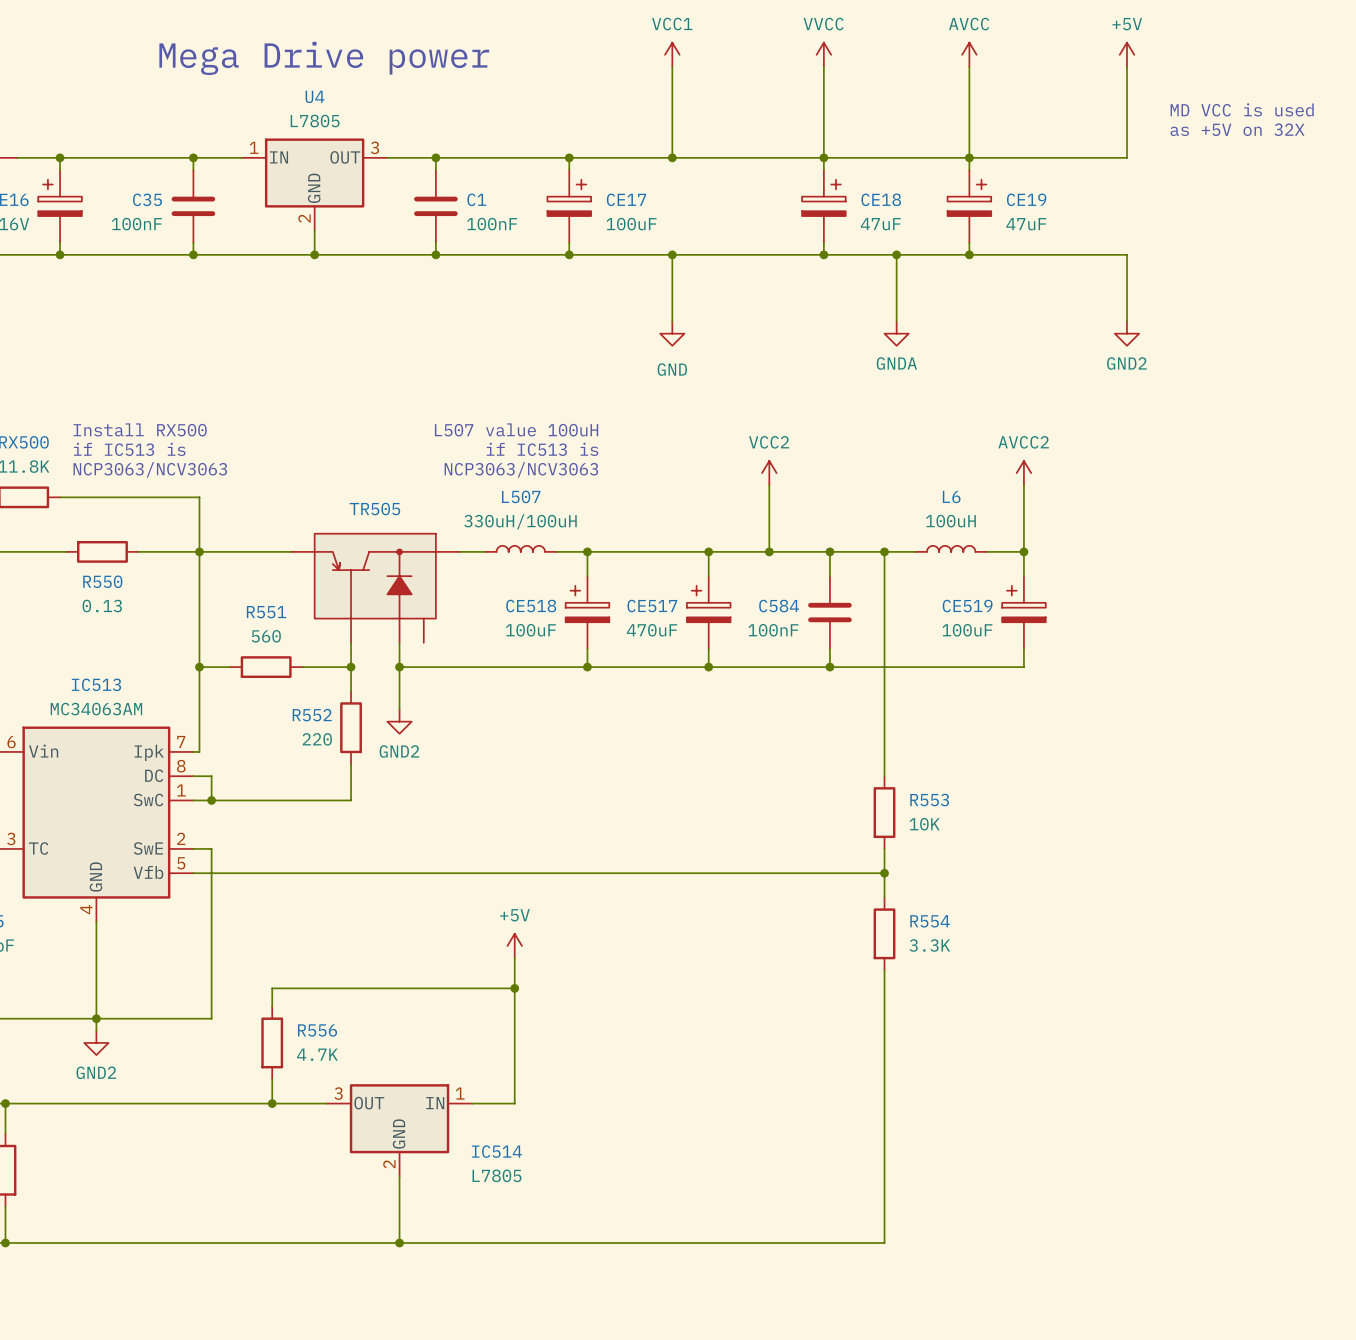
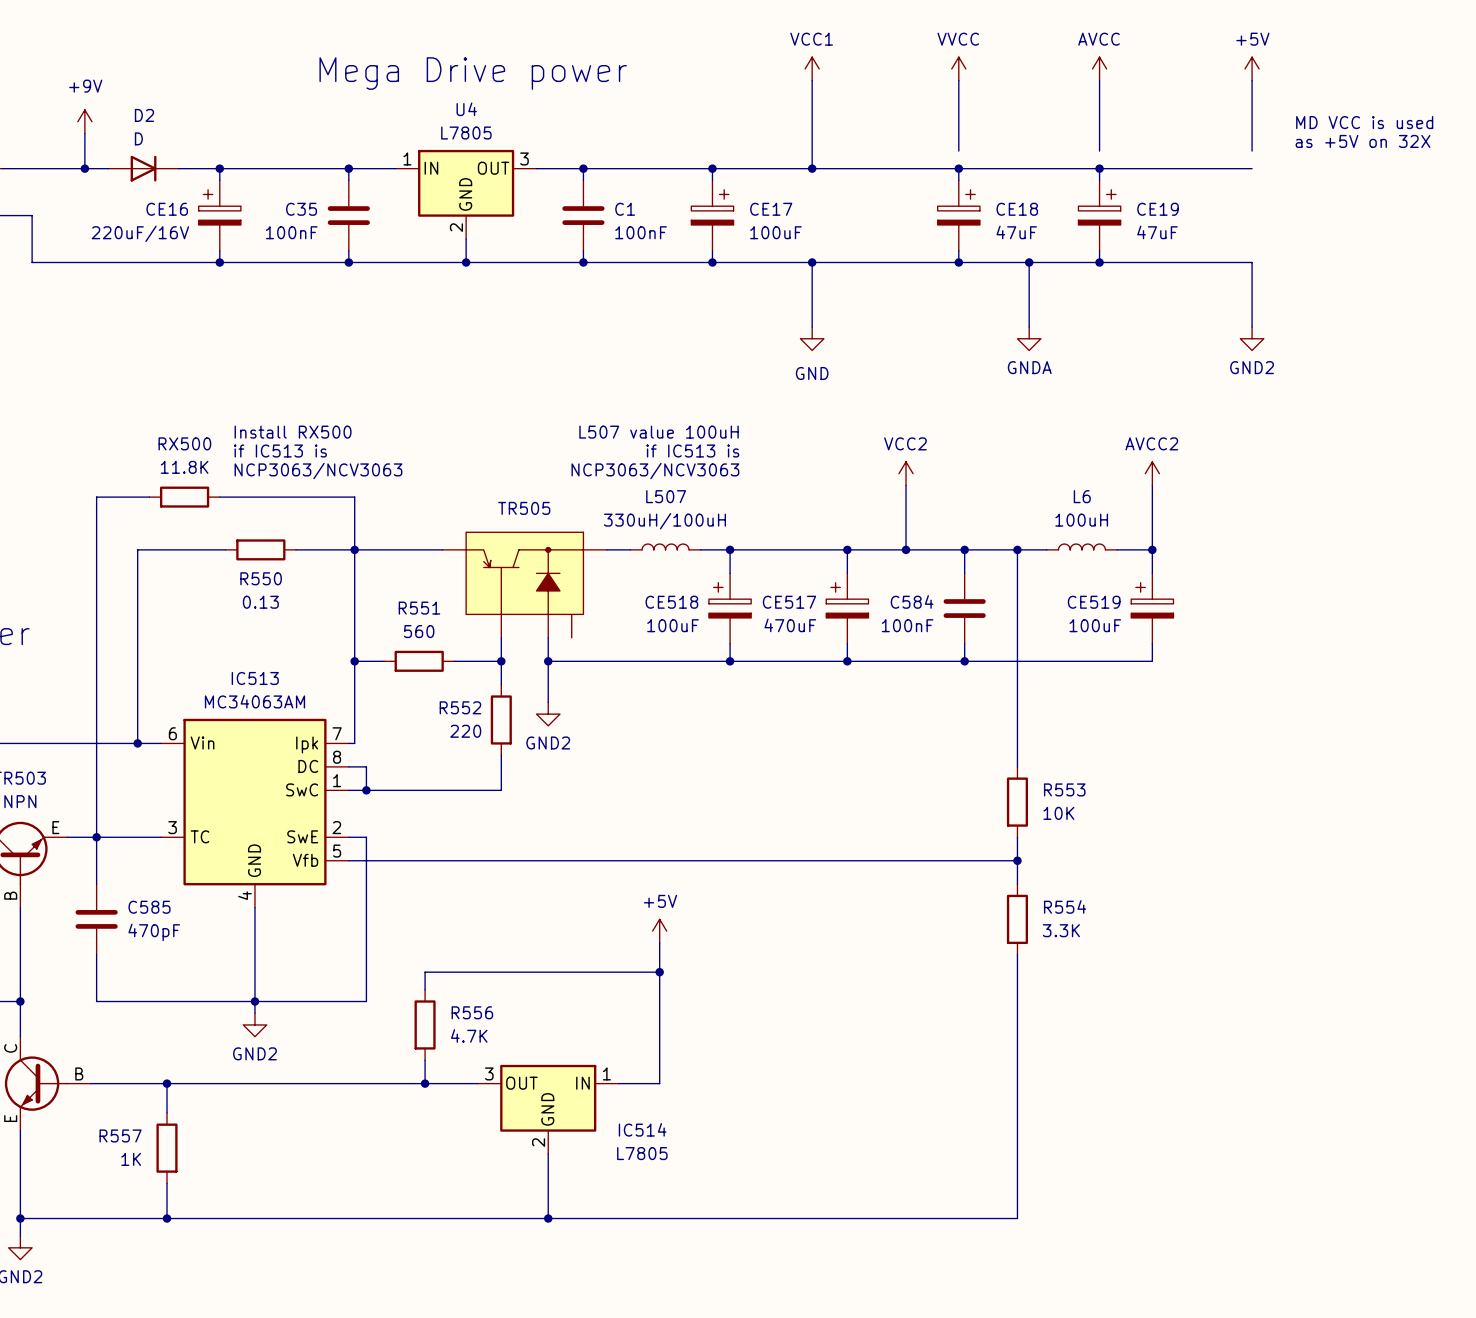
wire: (823, 139) (823, 157) -> none
wire: (969, 139) (969, 157) -> none
wire: (1127, 139) (1127, 157) -> none

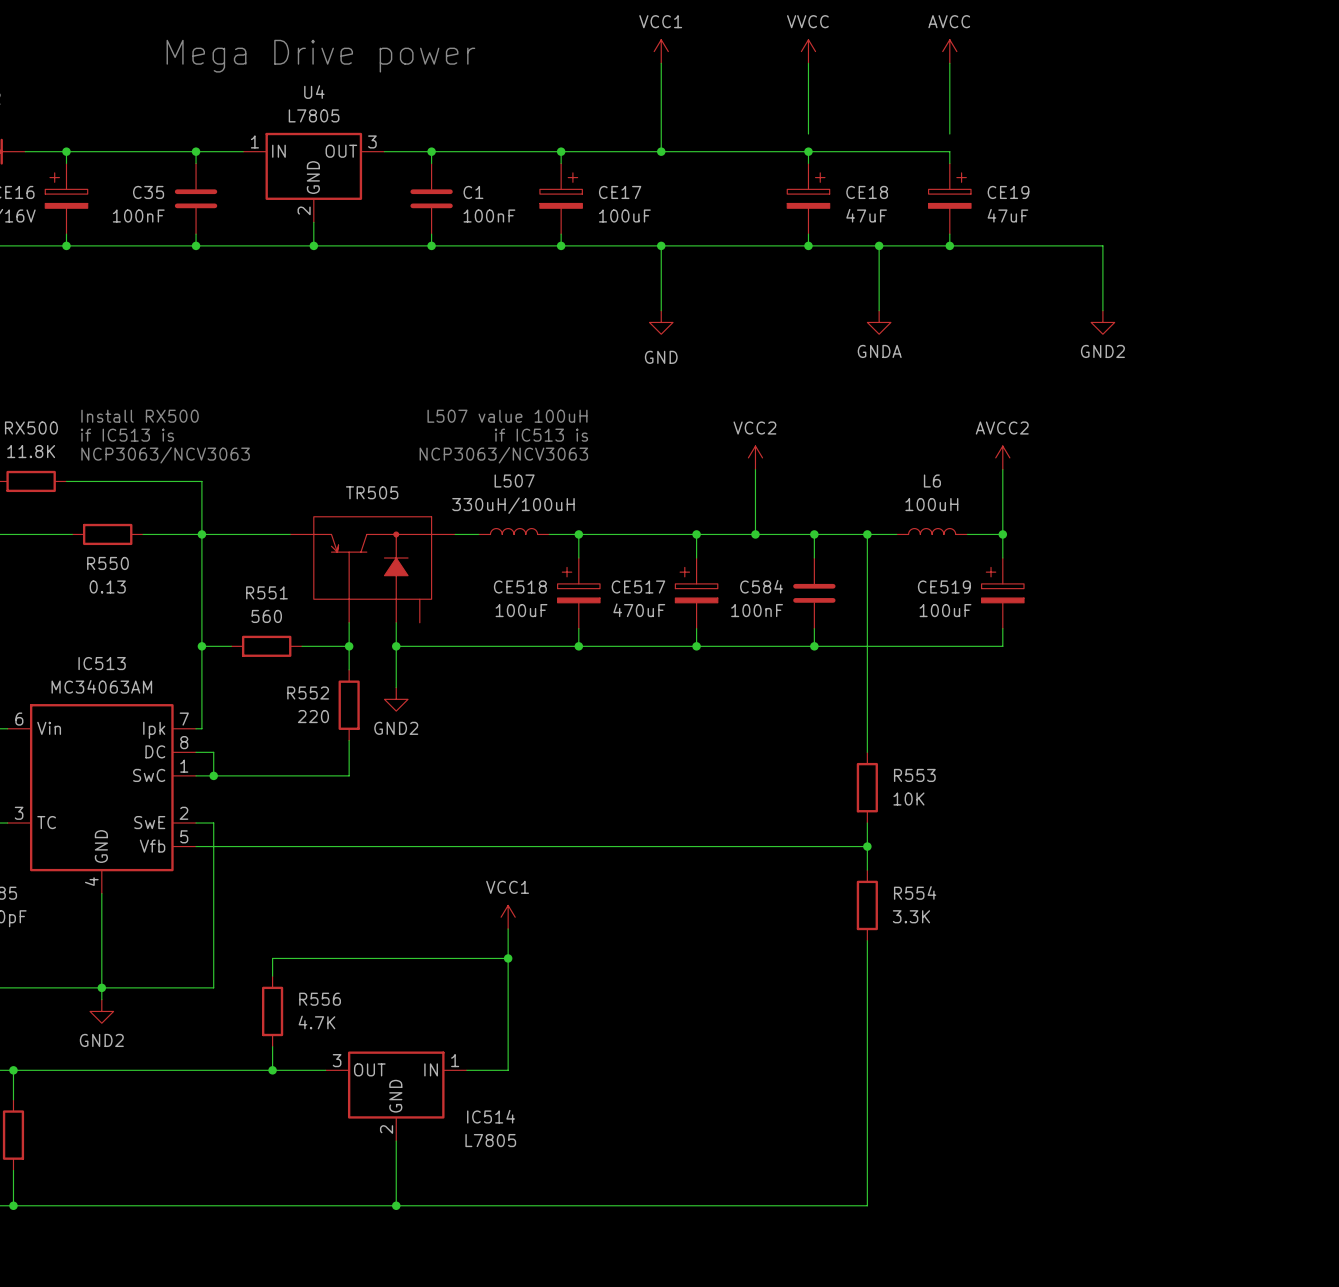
power symbol: +5V (1252, 68) -> none
wire: (1252, 80) (1252, 151) -> none
text: MD VCC is used (1364, 122) -> none
text: as +5V on 32X (1363, 141) -> none
wire: (1099, 168) (1252, 168) -> none
junction: (1099, 168) -> none
power symbol: +5V (659, 931) -> VCC1 (508, 917)

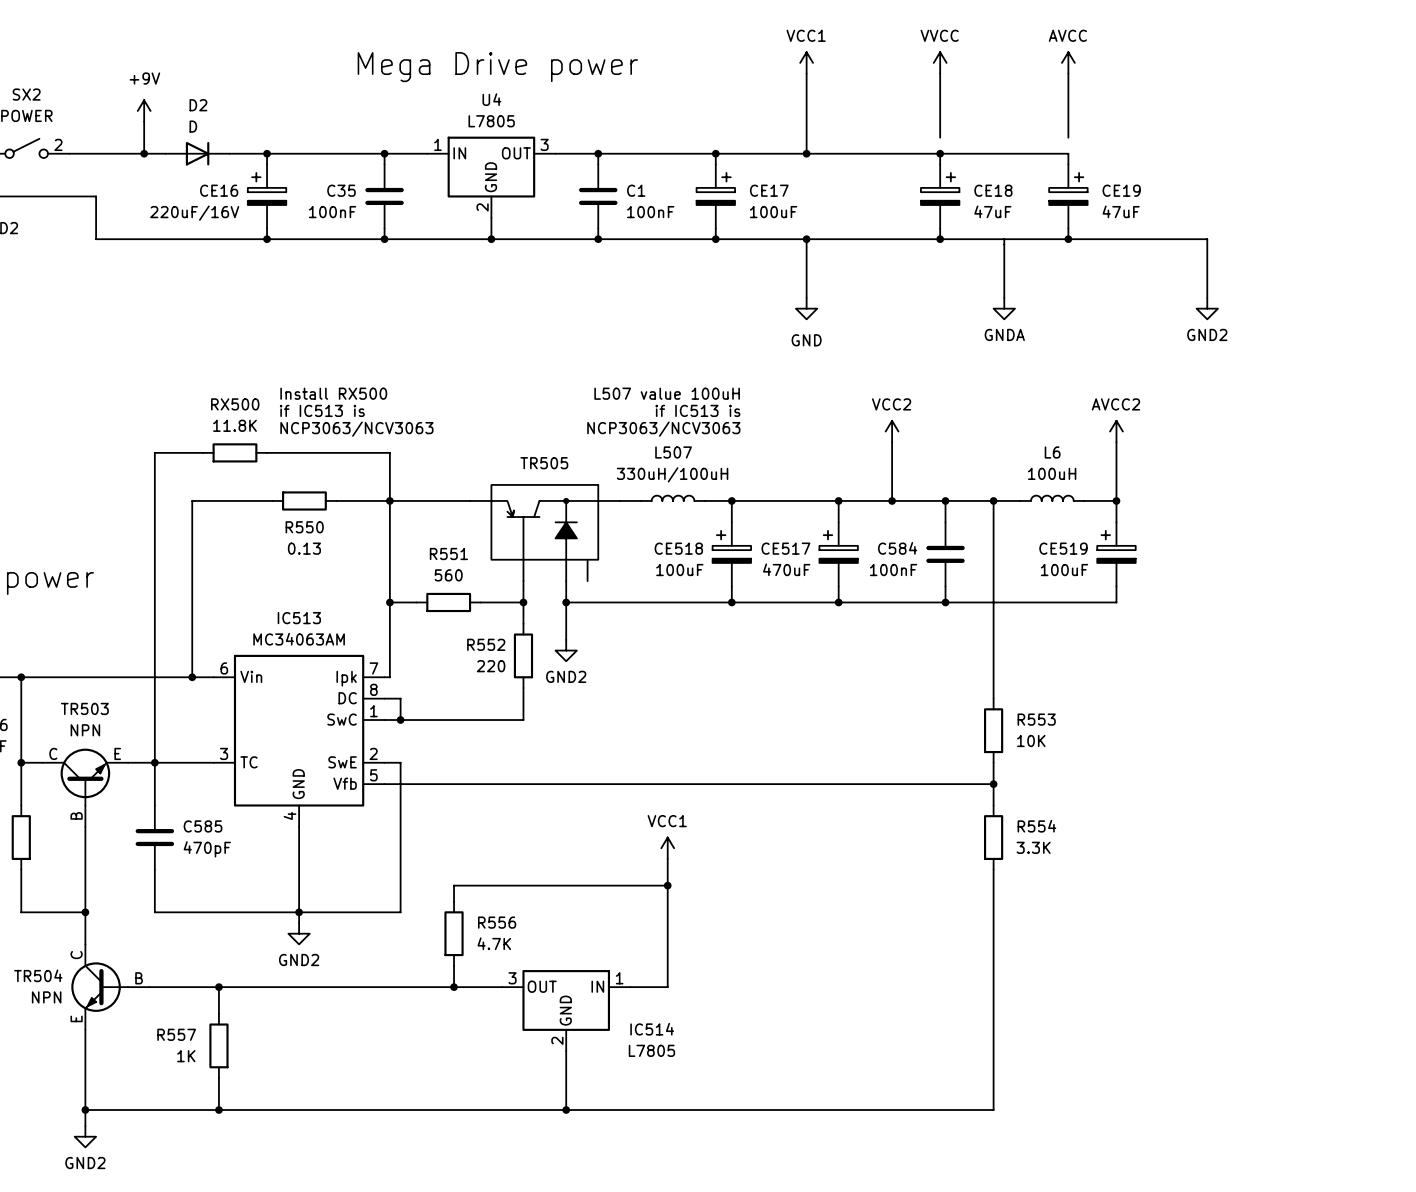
junction: (879, 245) -> none

